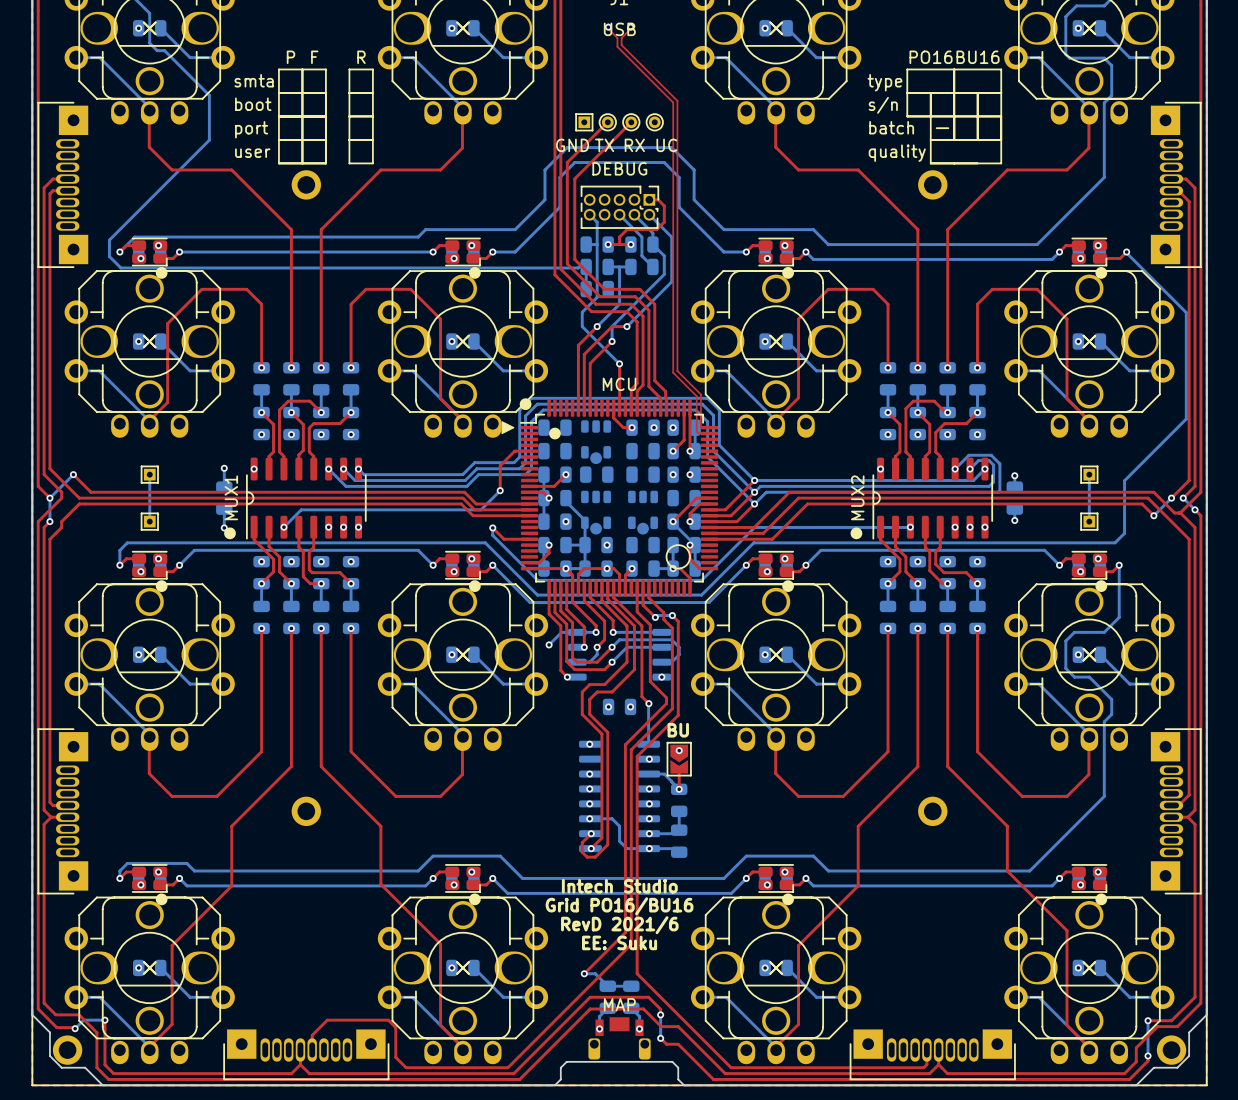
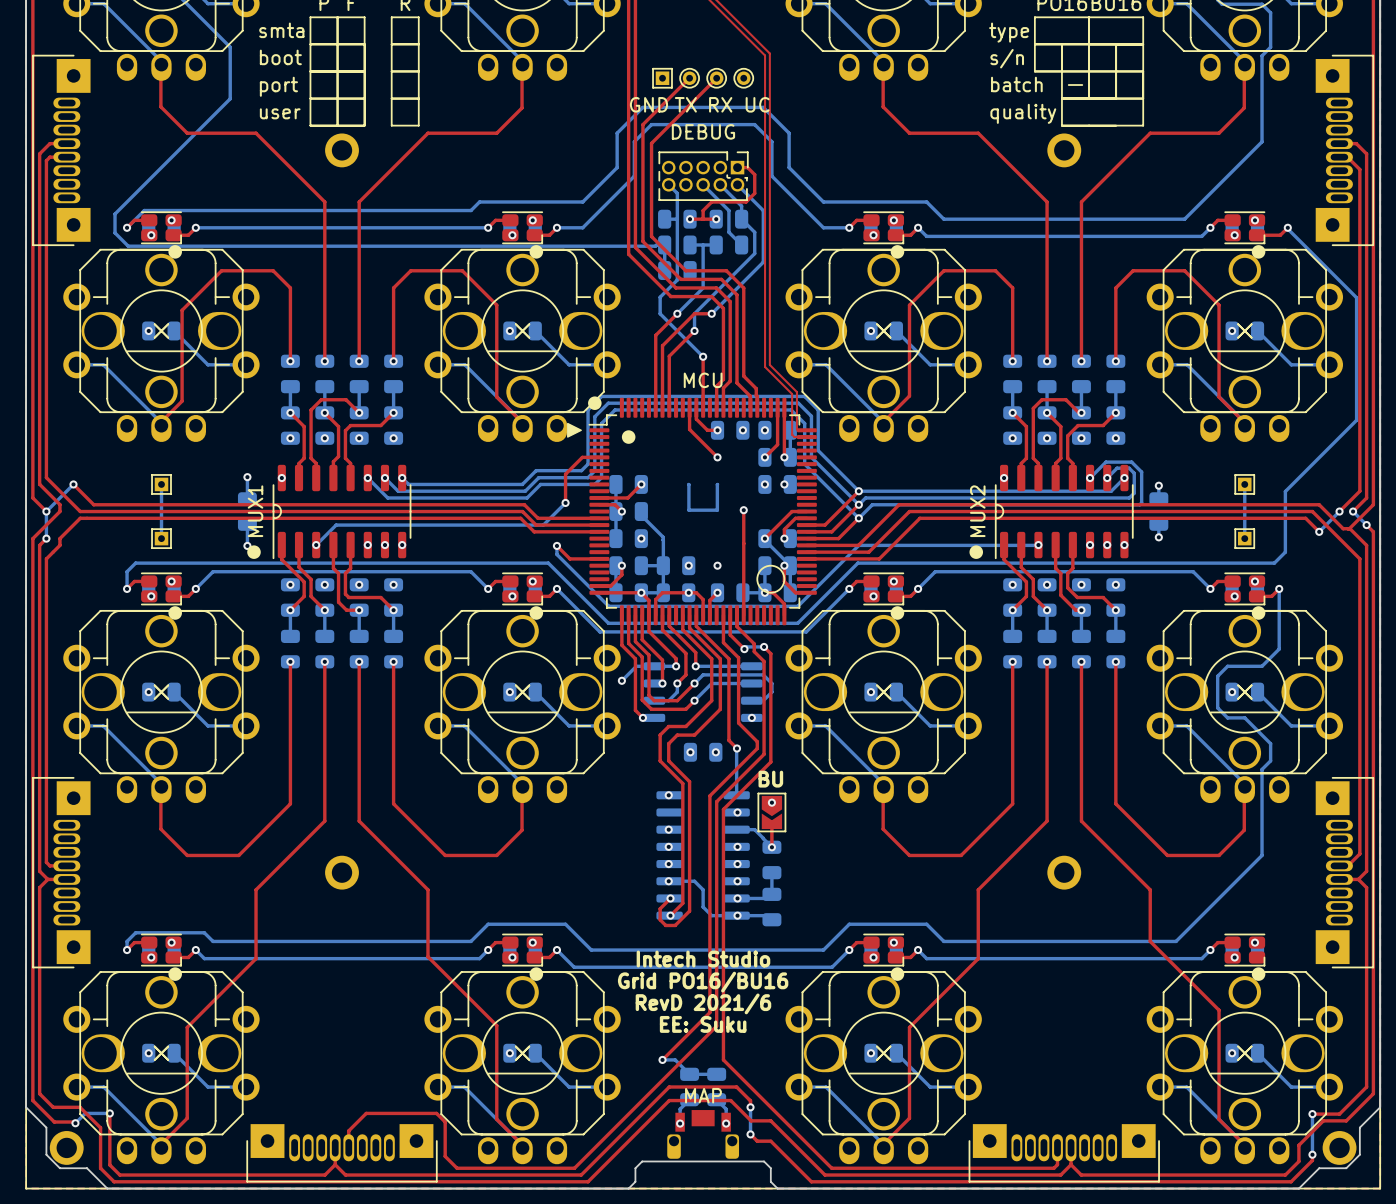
top track: none -> (689, 407) (689, 429) (717, 457)
part: (554, 427) -> none
part: (596, 439) -> none
part: (554, 451) -> none
via: none -> (717, 457)
part: (643, 451) -> none
part: (596, 458) -> none
part: (596, 474) -> none
bottom track: none -> (688, 484) (688, 510) (717, 510) (717, 484)
part: (643, 474) -> none
top track: none -> (743, 510) (743, 615)
via: none -> (743, 510)
part: (684, 498) -> none
part: (596, 509) -> none
part: (643, 509) -> none
part: (596, 528) -> none
part: (643, 528) -> none
via: none -> (717, 565)
part: (643, 545) -> none

